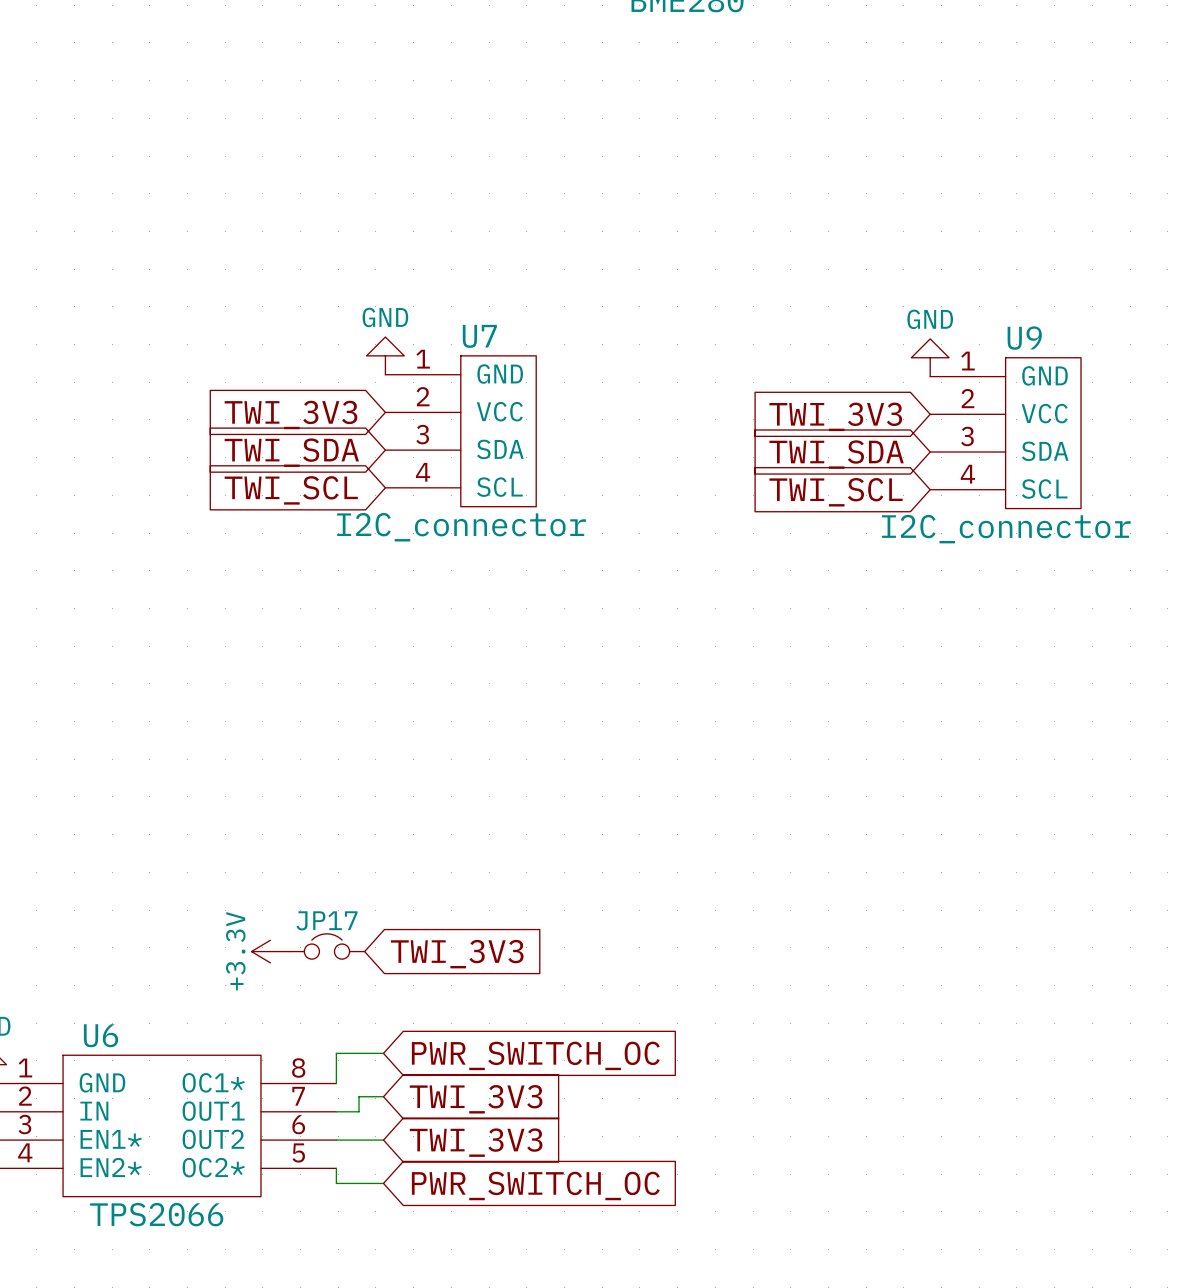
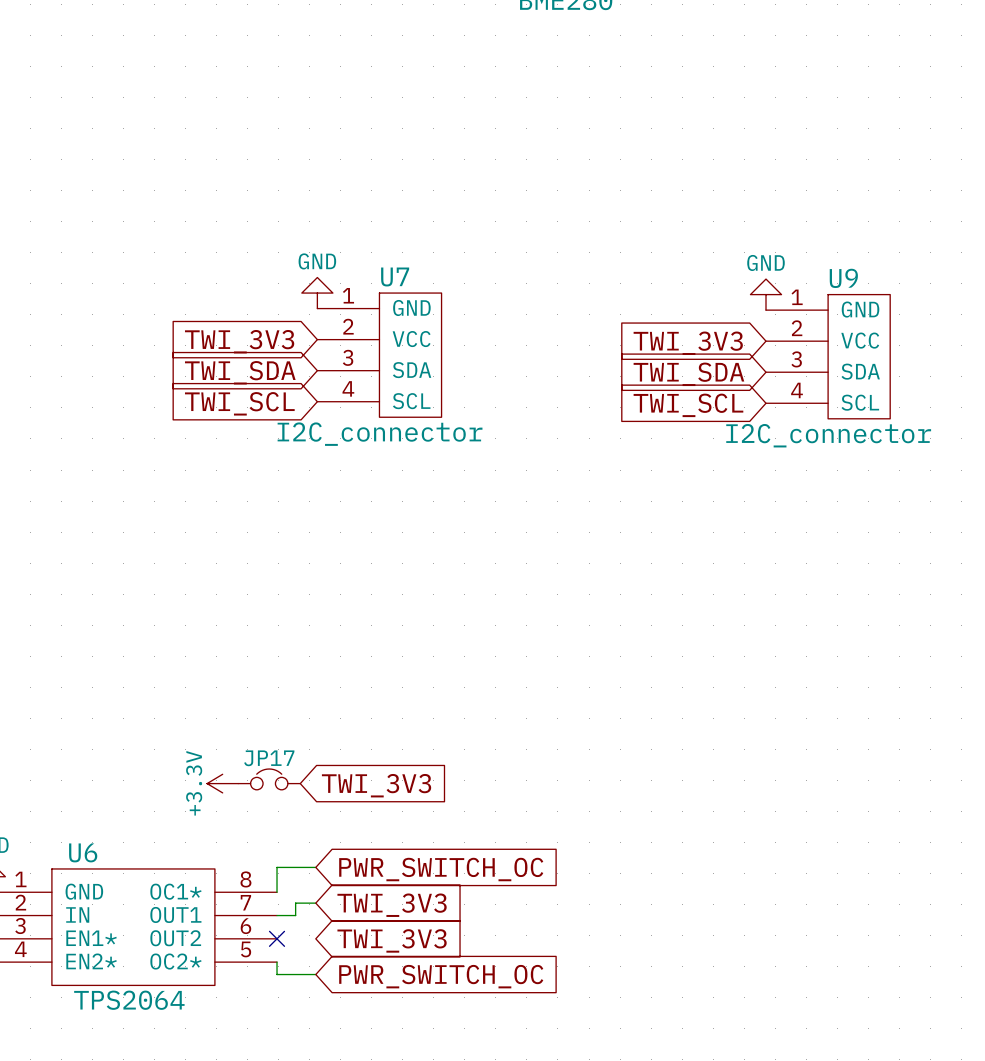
wire: (336, 1140) (383, 1140) -> none
no-connect mark: none -> (277, 938)
U6 value: TPS2066 (156, 1214) -> TPS2064 (129, 1000)

